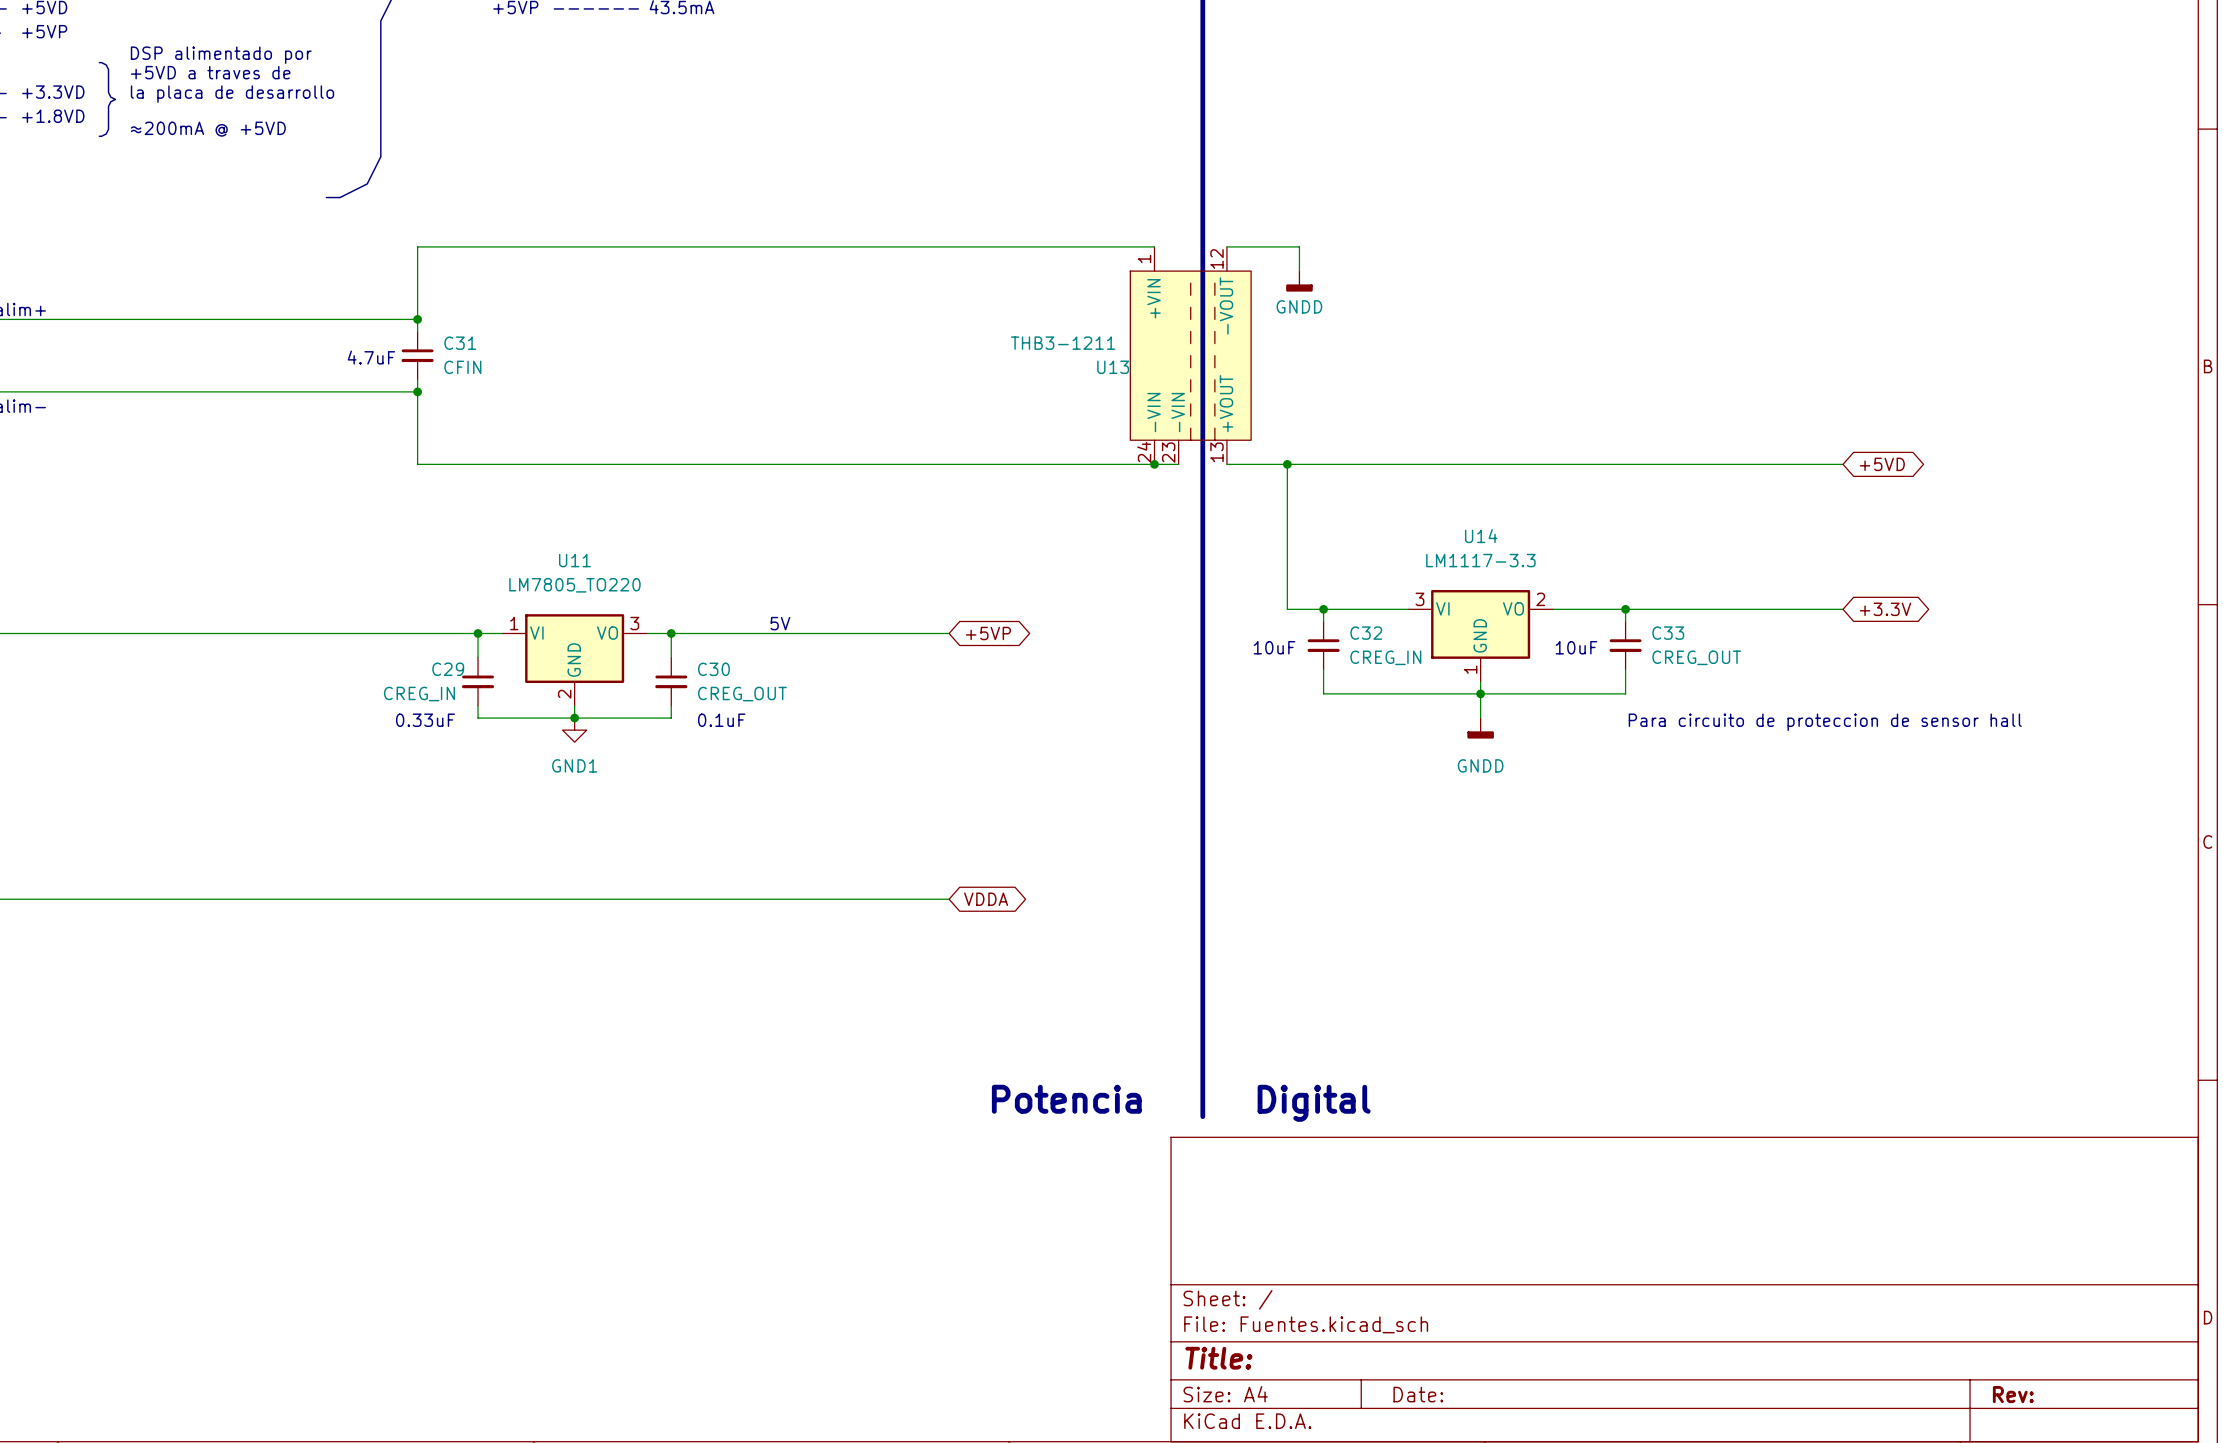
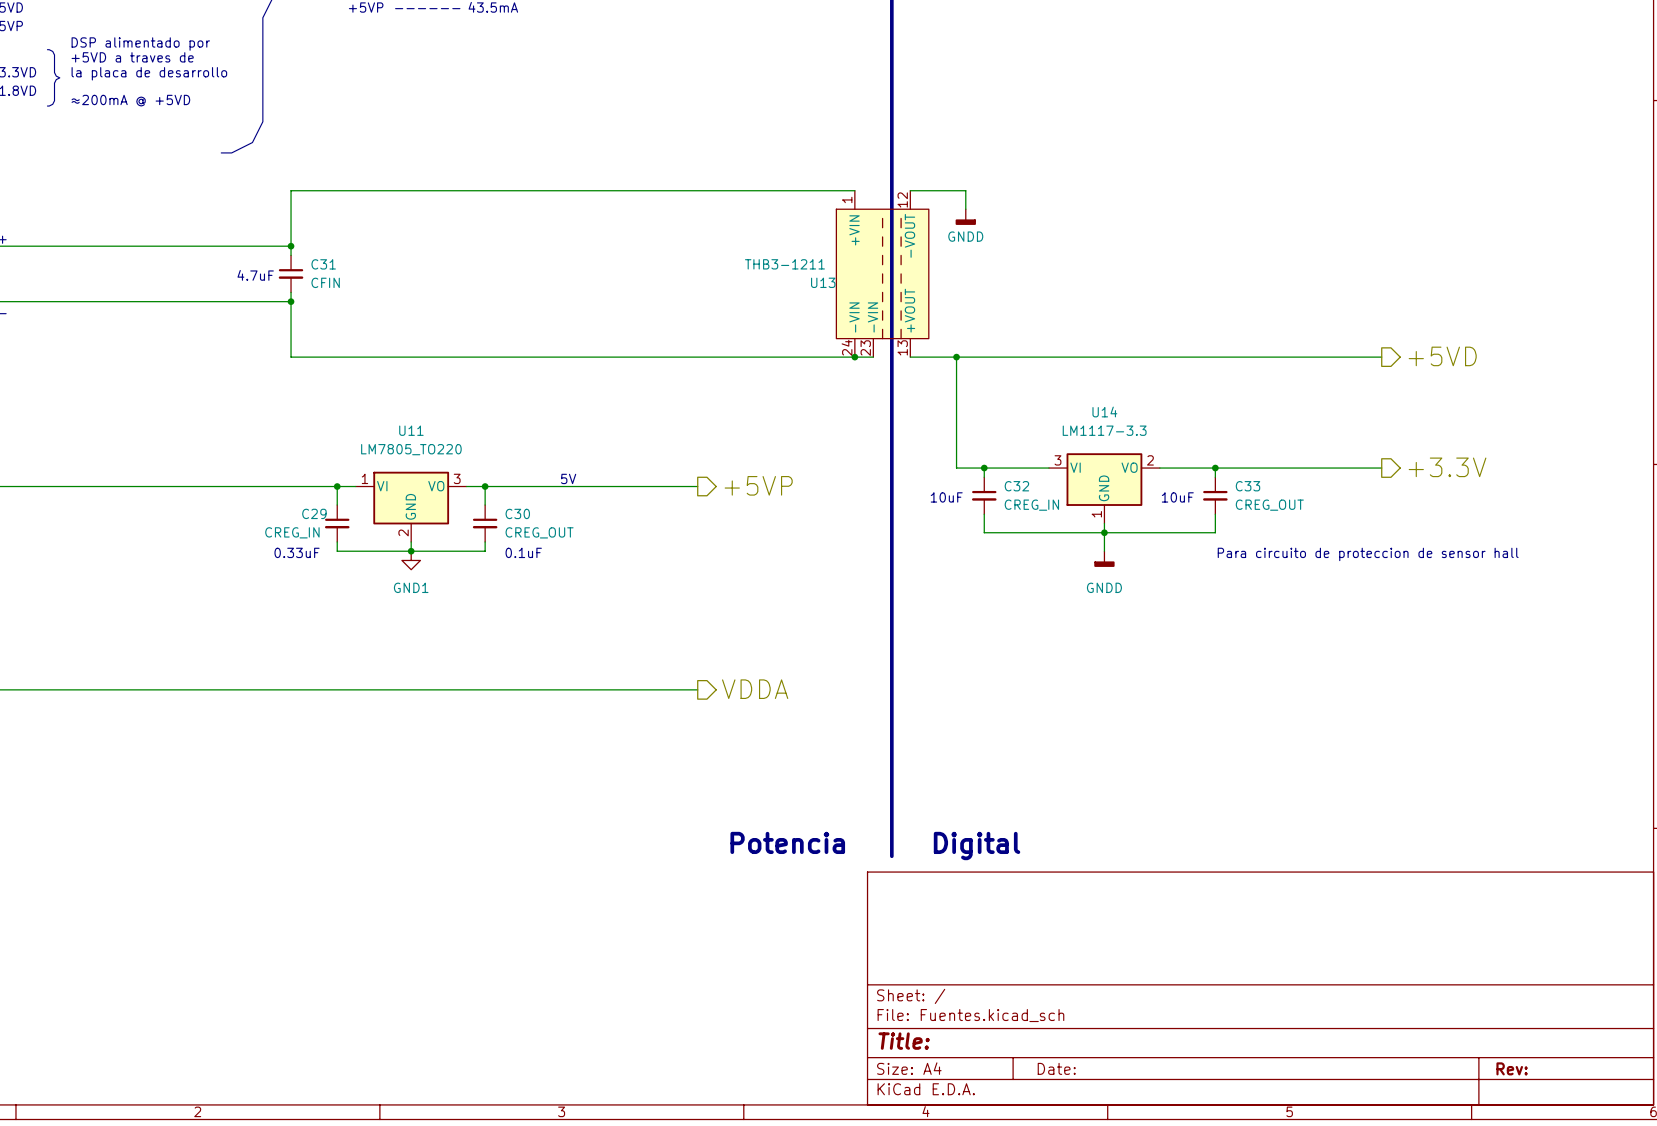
hierarchical label: none -> +5VD (1442, 356)
global label: +5VD (1882, 464) -> none
hierarchical label: none -> +3.3V (1447, 467)
global label: +3.3V (1885, 609) -> none
hierarchical label: none -> +5VP (758, 485)
global label: +5VP (988, 633) -> none
hierarchical label: none -> VDDA (755, 689)
global label: VDDA (986, 899) -> none

